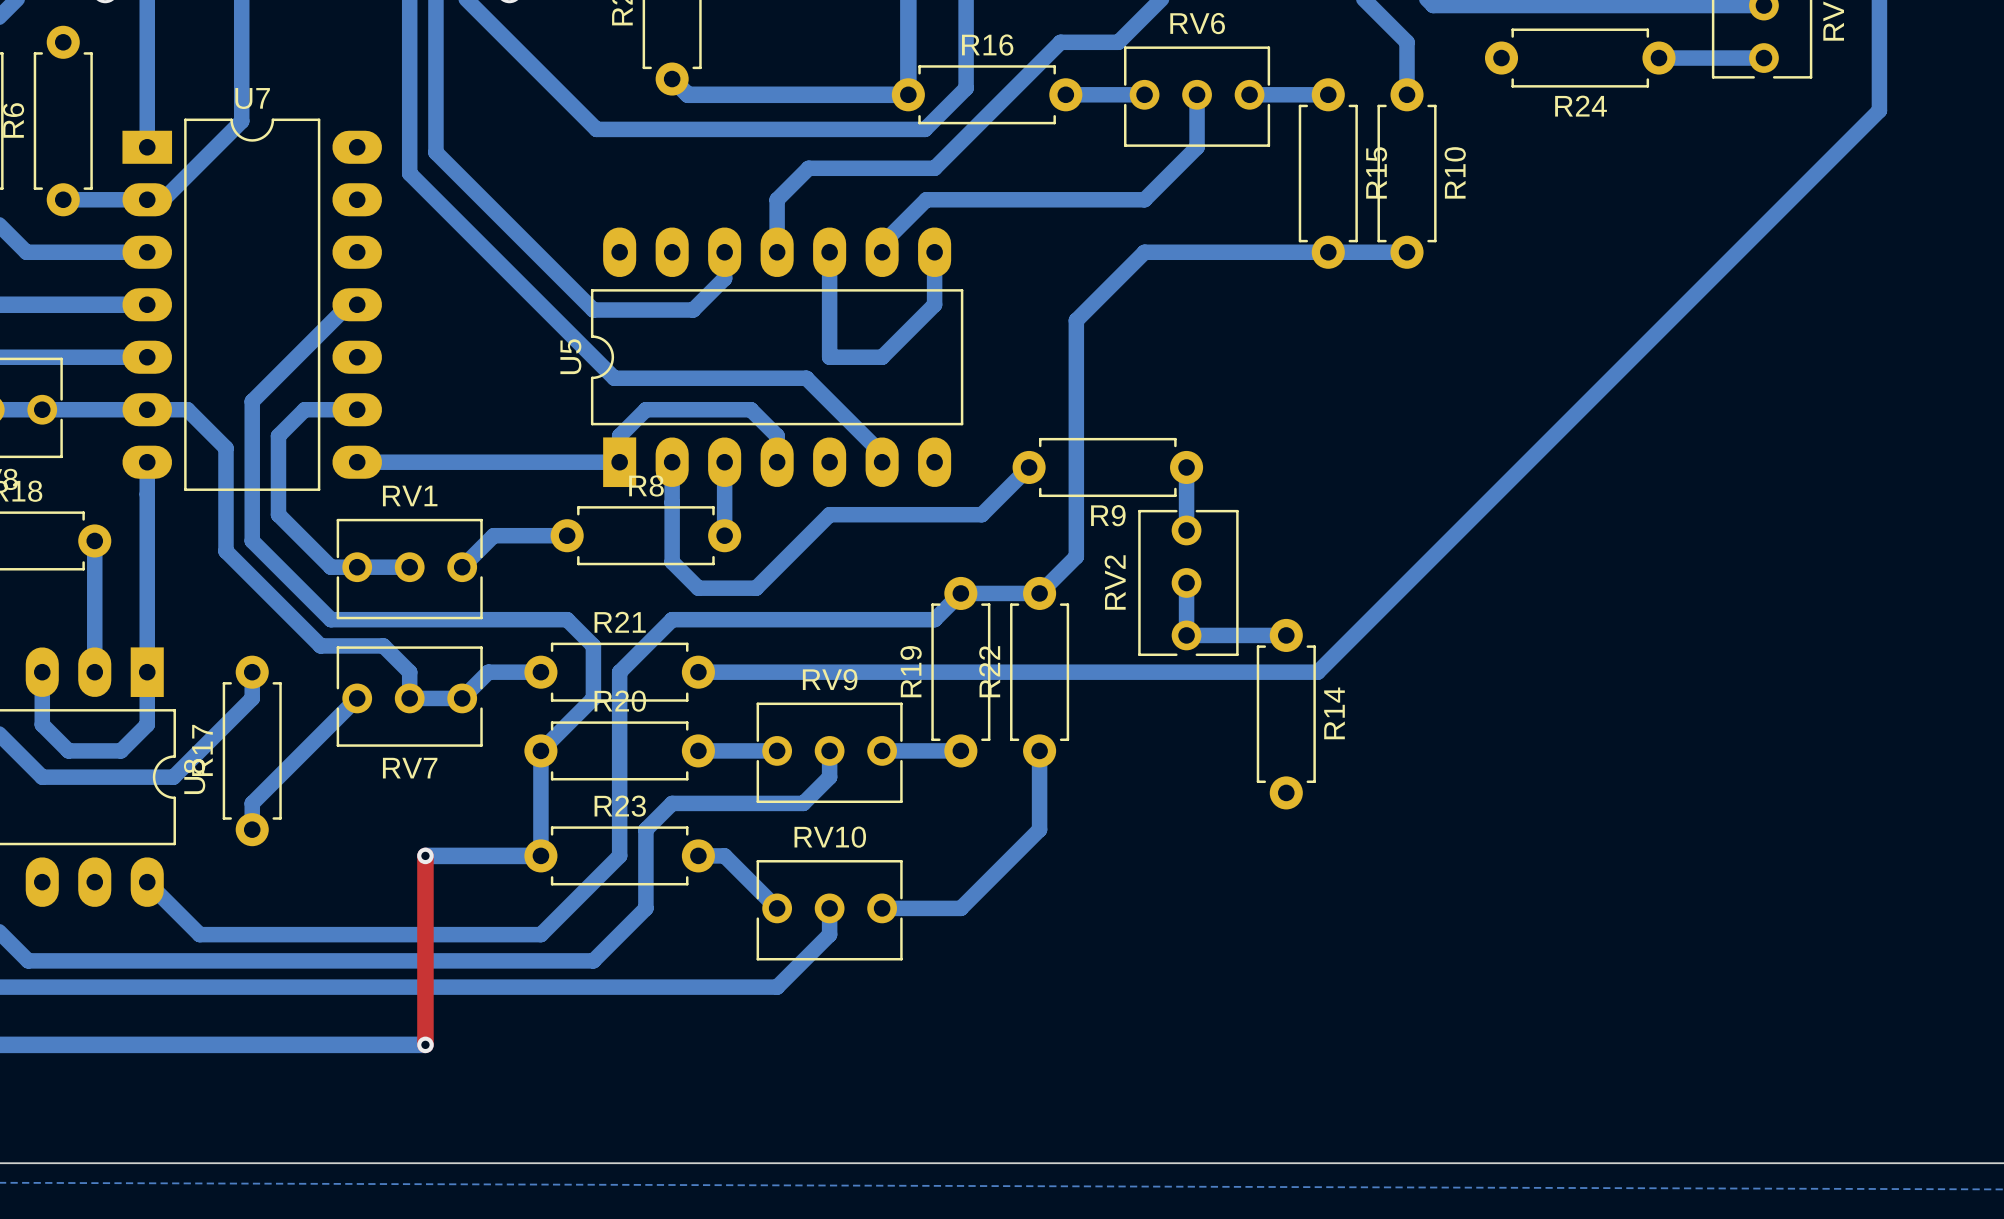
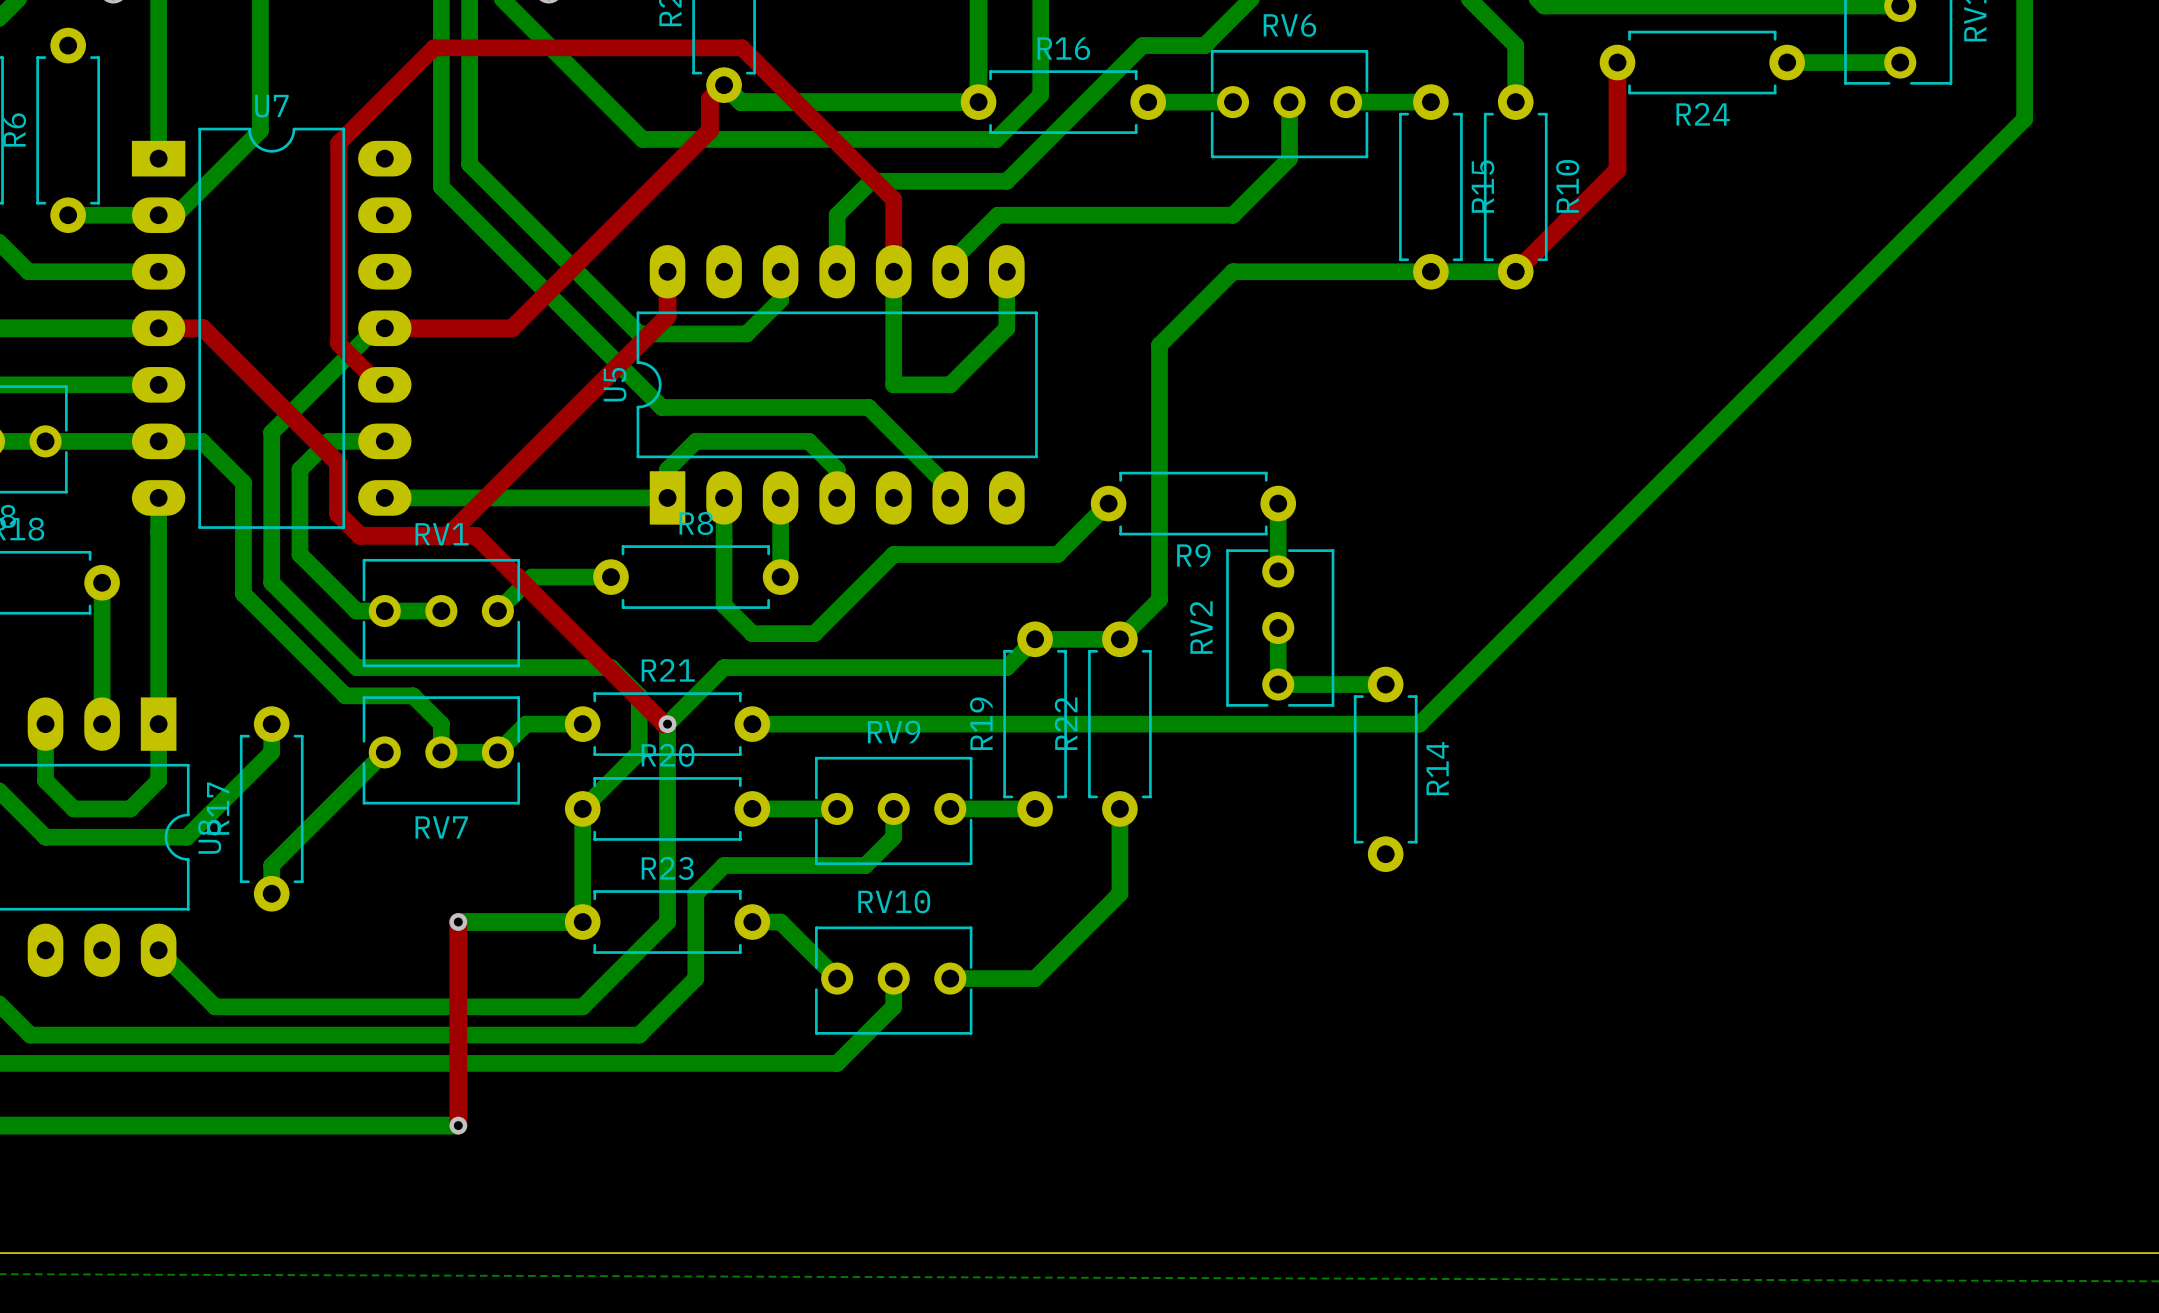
top track: none -> (1617, 62) (1617, 169) (1515, 271)
top track: none -> (724, 85) (709, 99) (709, 130) (512, 328) (384, 328)
top track: none -> (667, 271) (667, 316) (448, 535)
top track: none -> (893, 271) (893, 199) (741, 47) (433, 47) (338, 143) (338, 343) (379, 384) (384, 384)
top track: none -> (158, 328) (203, 328) (338, 463) (338, 513) (360, 535) (476, 535) (664, 724) (667, 724)
via: none -> (667, 724)

